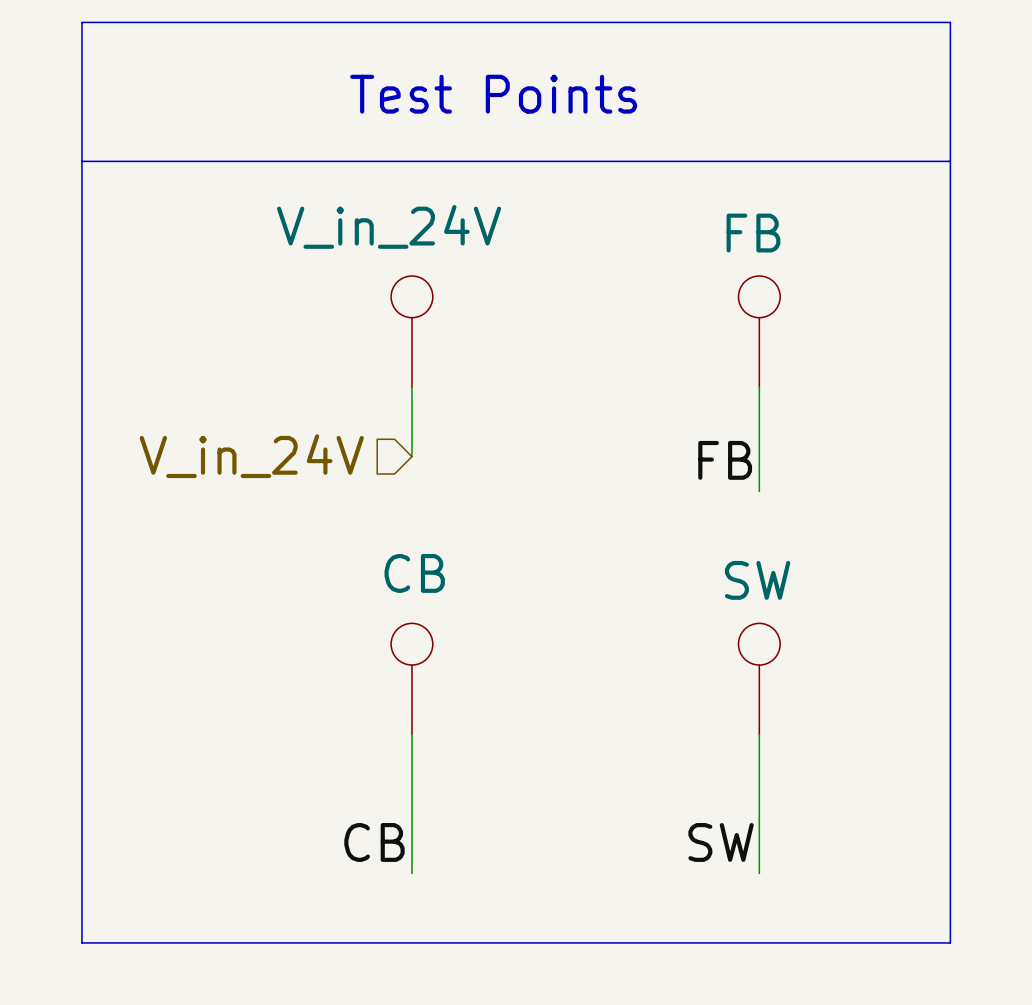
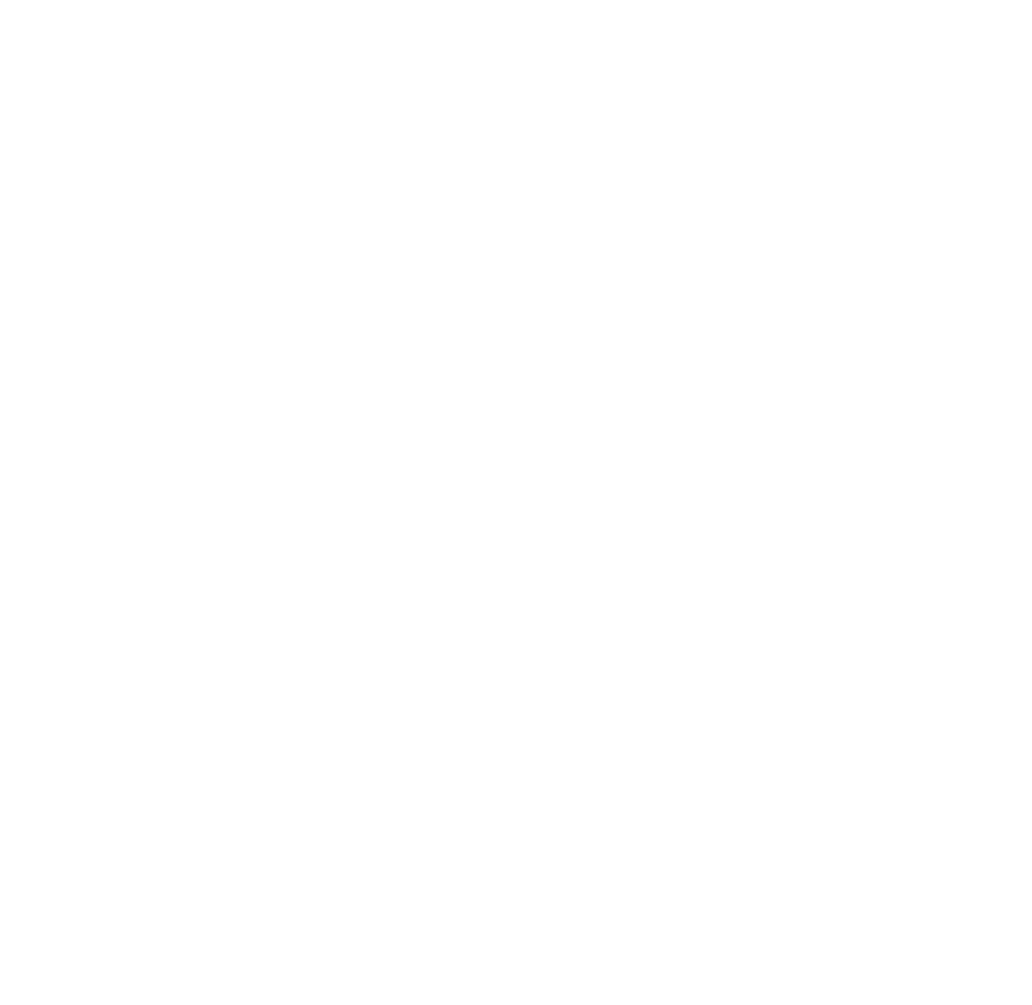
line: (81, 22) (950, 22) (950, 942) (81, 942) (81, 22) -> none
text: Test Points (493, 94) -> none
line: (81, 161) (950, 161) -> none
part: V_in_24V (411, 331) -> none
part: FB (759, 331) -> none
wire: (411, 387) (411, 456) -> none
wire: (759, 387) (759, 491) -> none
hierarchical label: V_in_24V (251, 456) -> none
label: FB (725, 460) -> none
part: CB (411, 678) -> none
part: SW (759, 678) -> none
wire: (411, 734) (411, 873) -> none
wire: (759, 734) (759, 873) -> none
label: CB (374, 842) -> none
label: SW (721, 842) -> none

